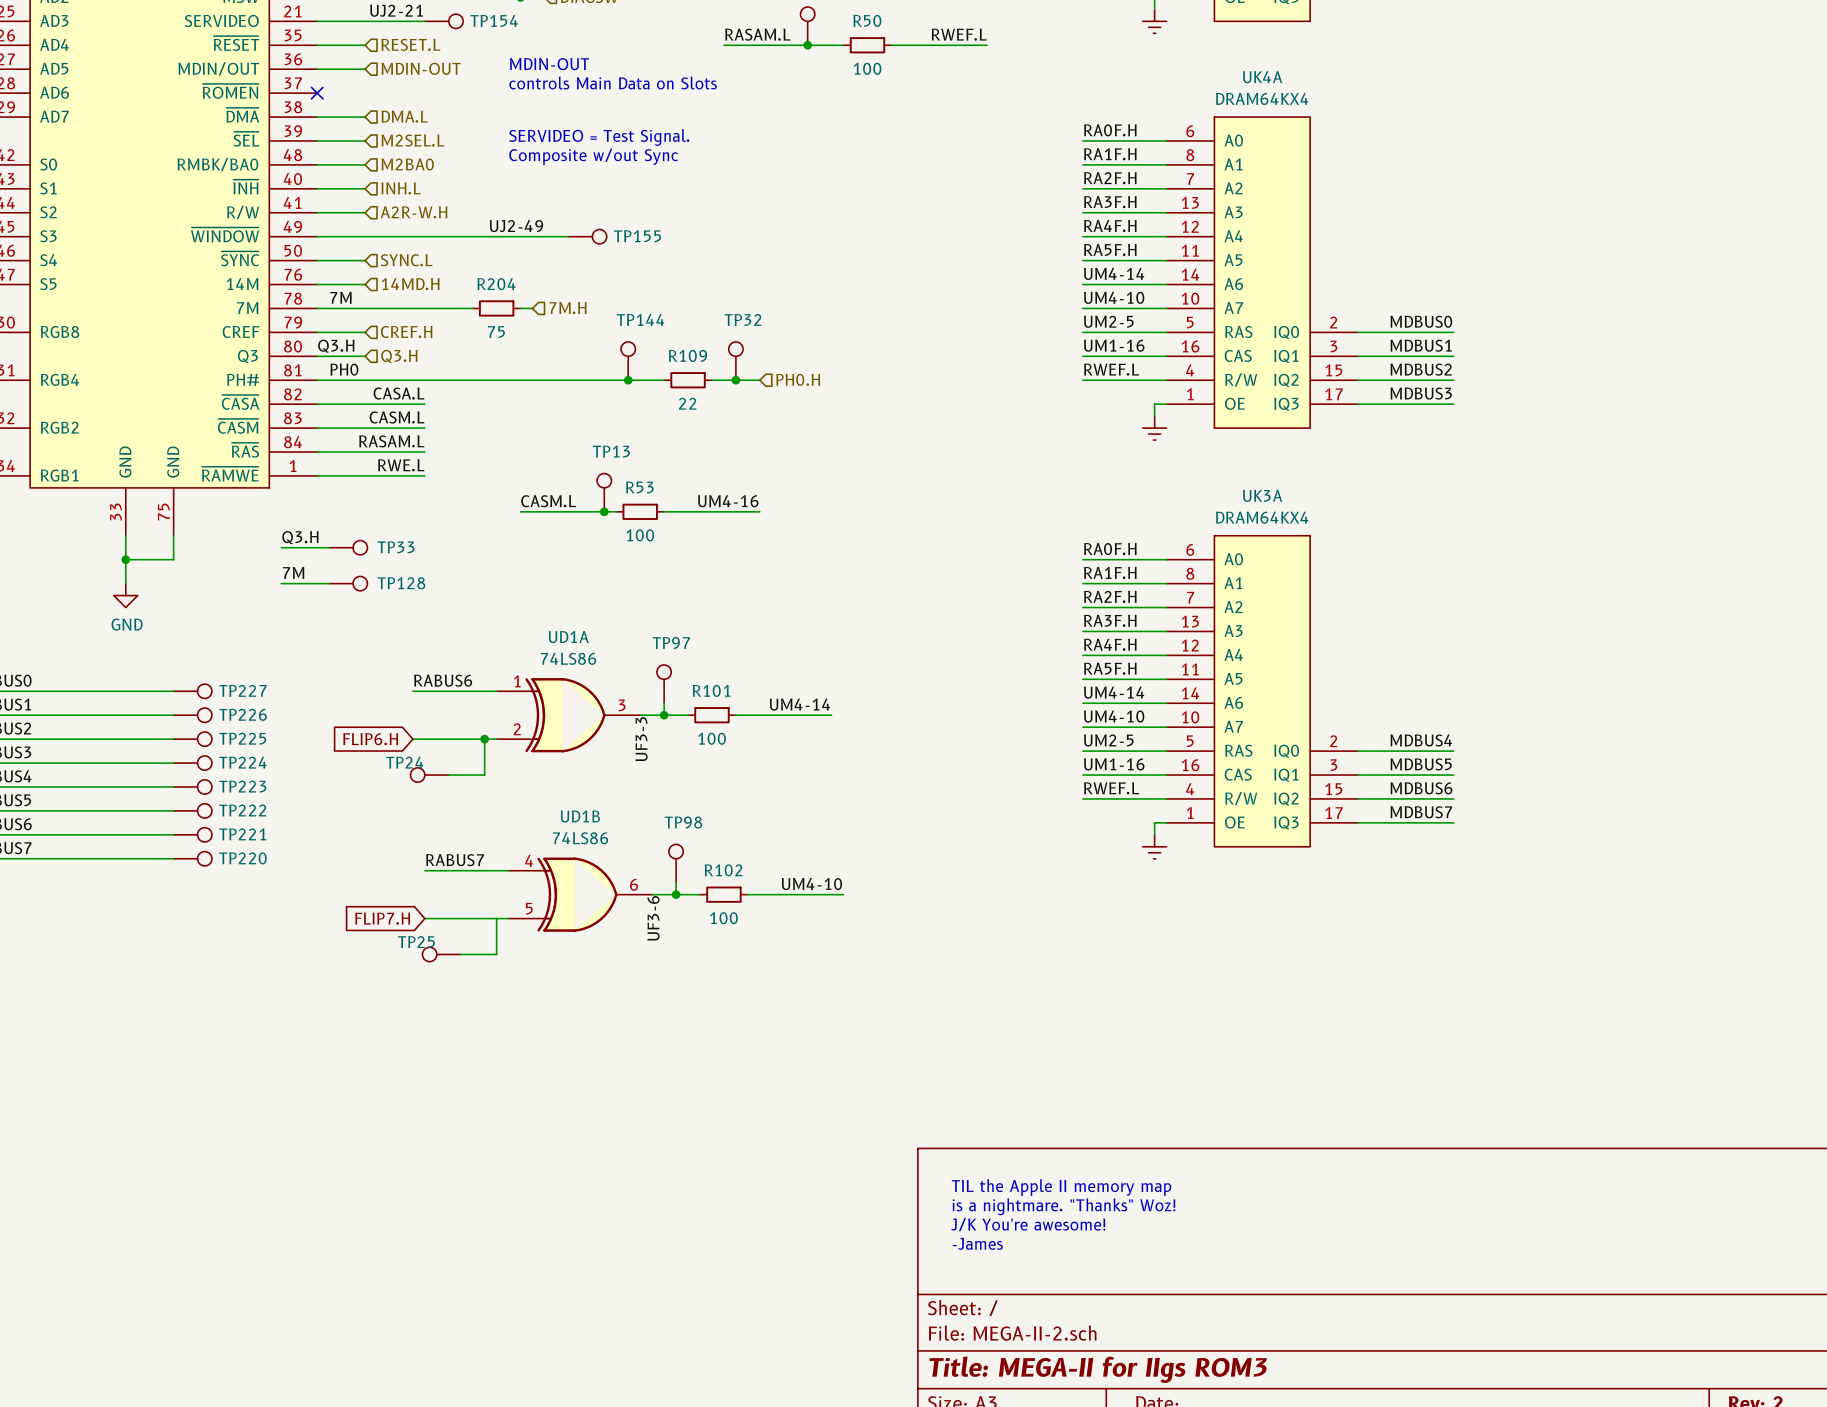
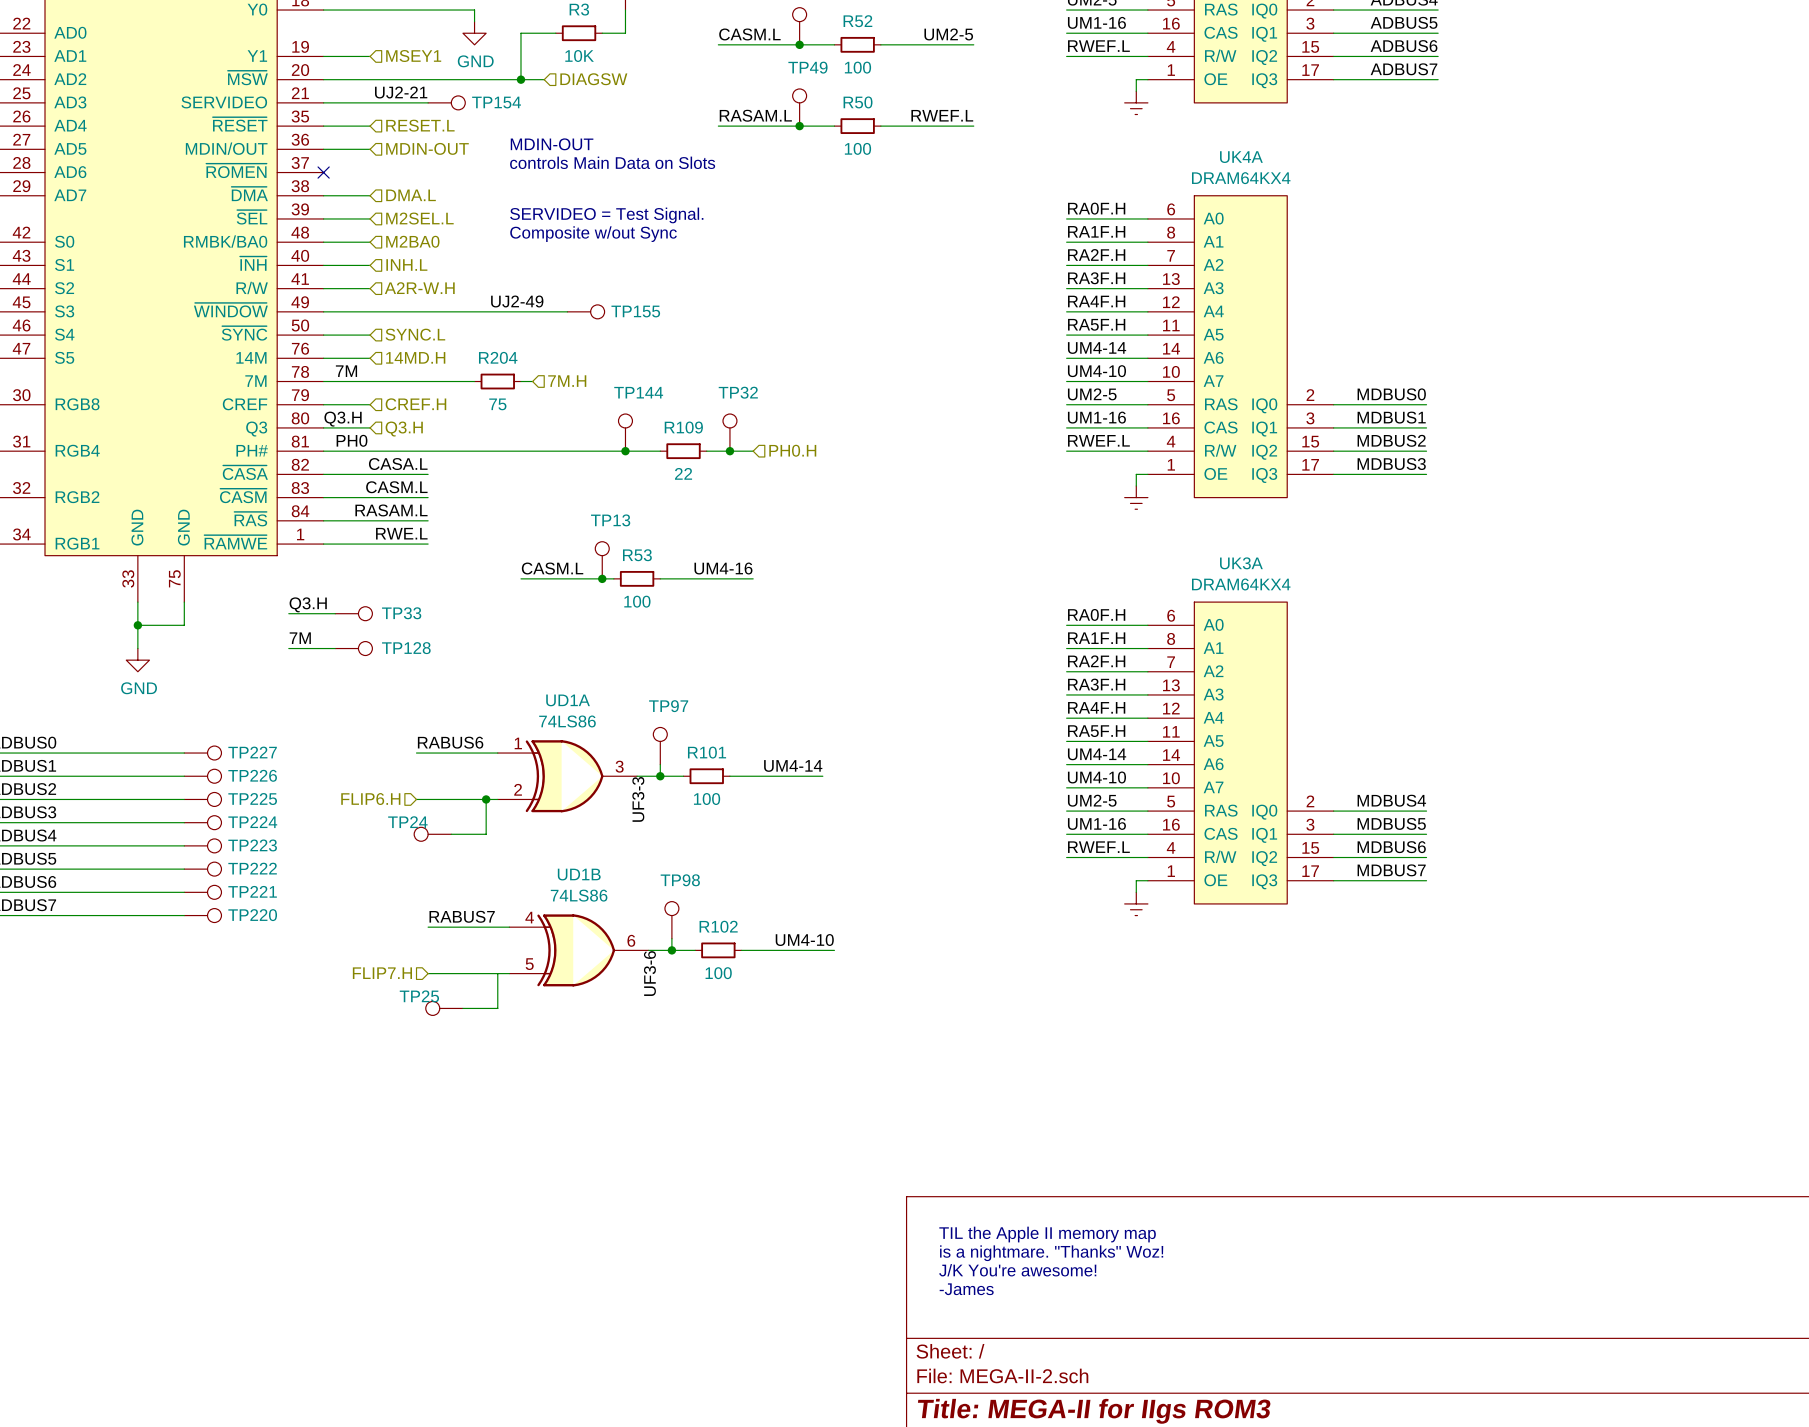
hierarchical label: none -> FLIP6.H (370, 799)
global label: FLIP6.H (370, 739) -> none
hierarchical label: none -> FLIP7.H (382, 973)
global label: FLIP7.H (382, 918) -> none

